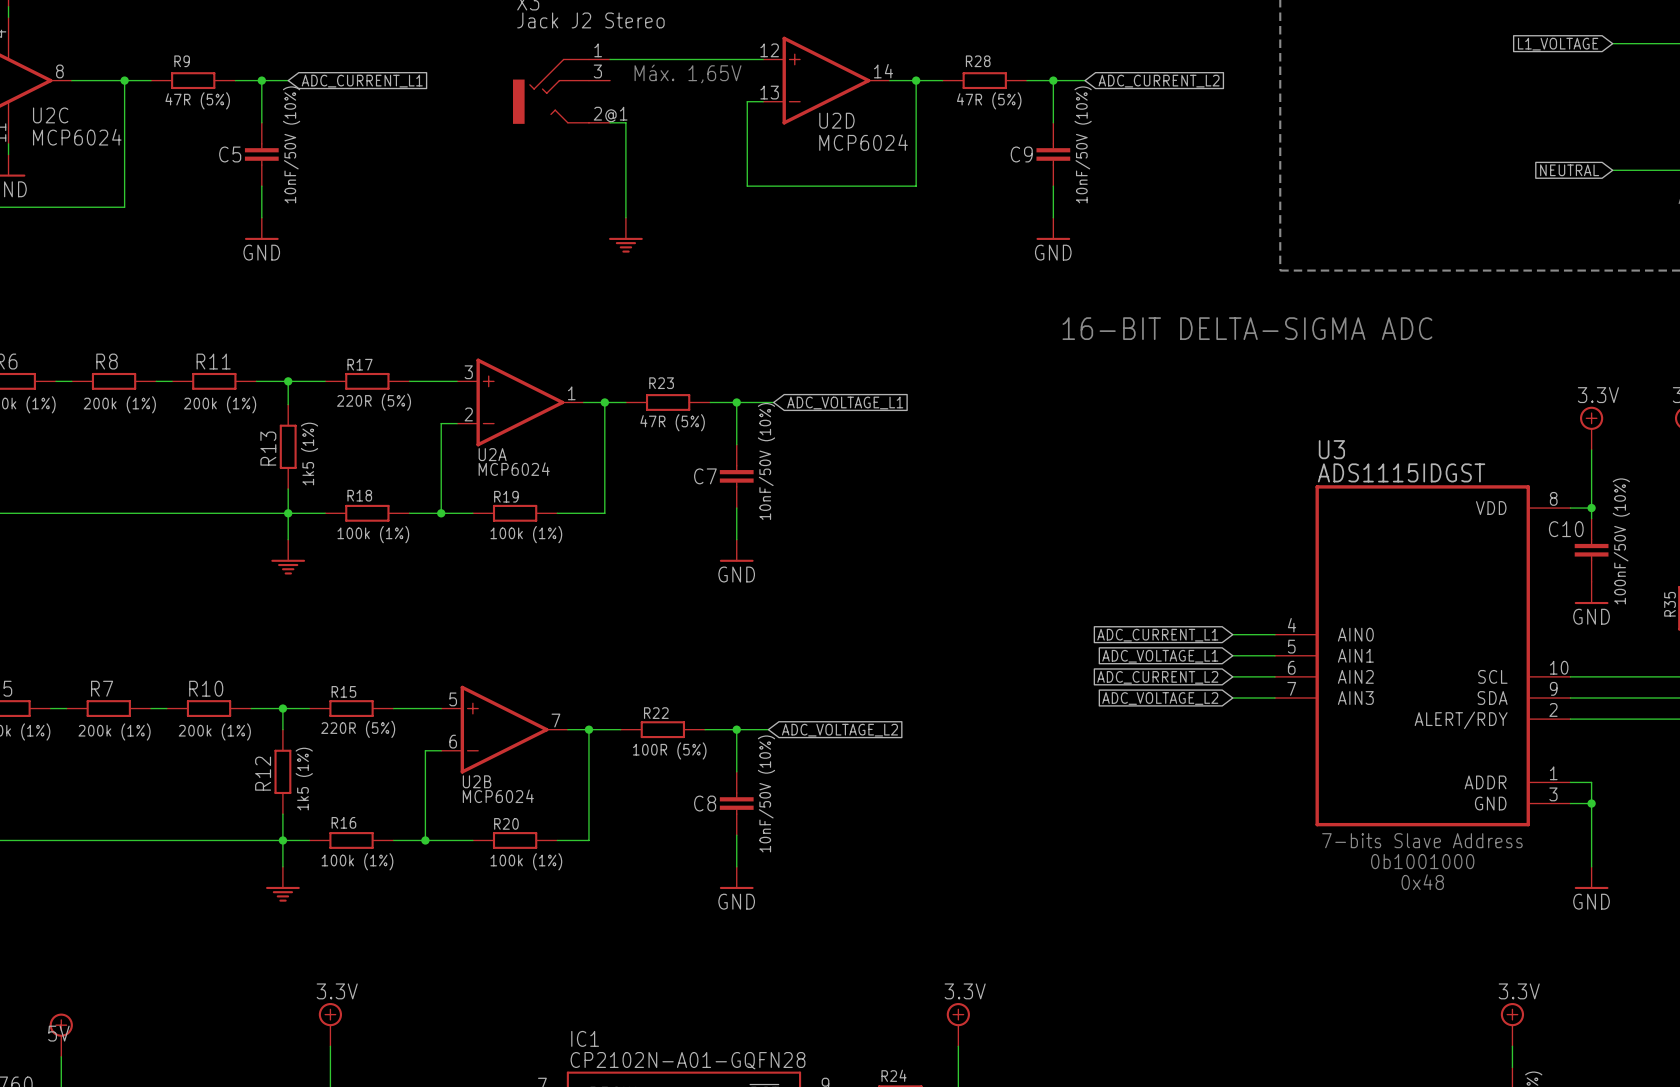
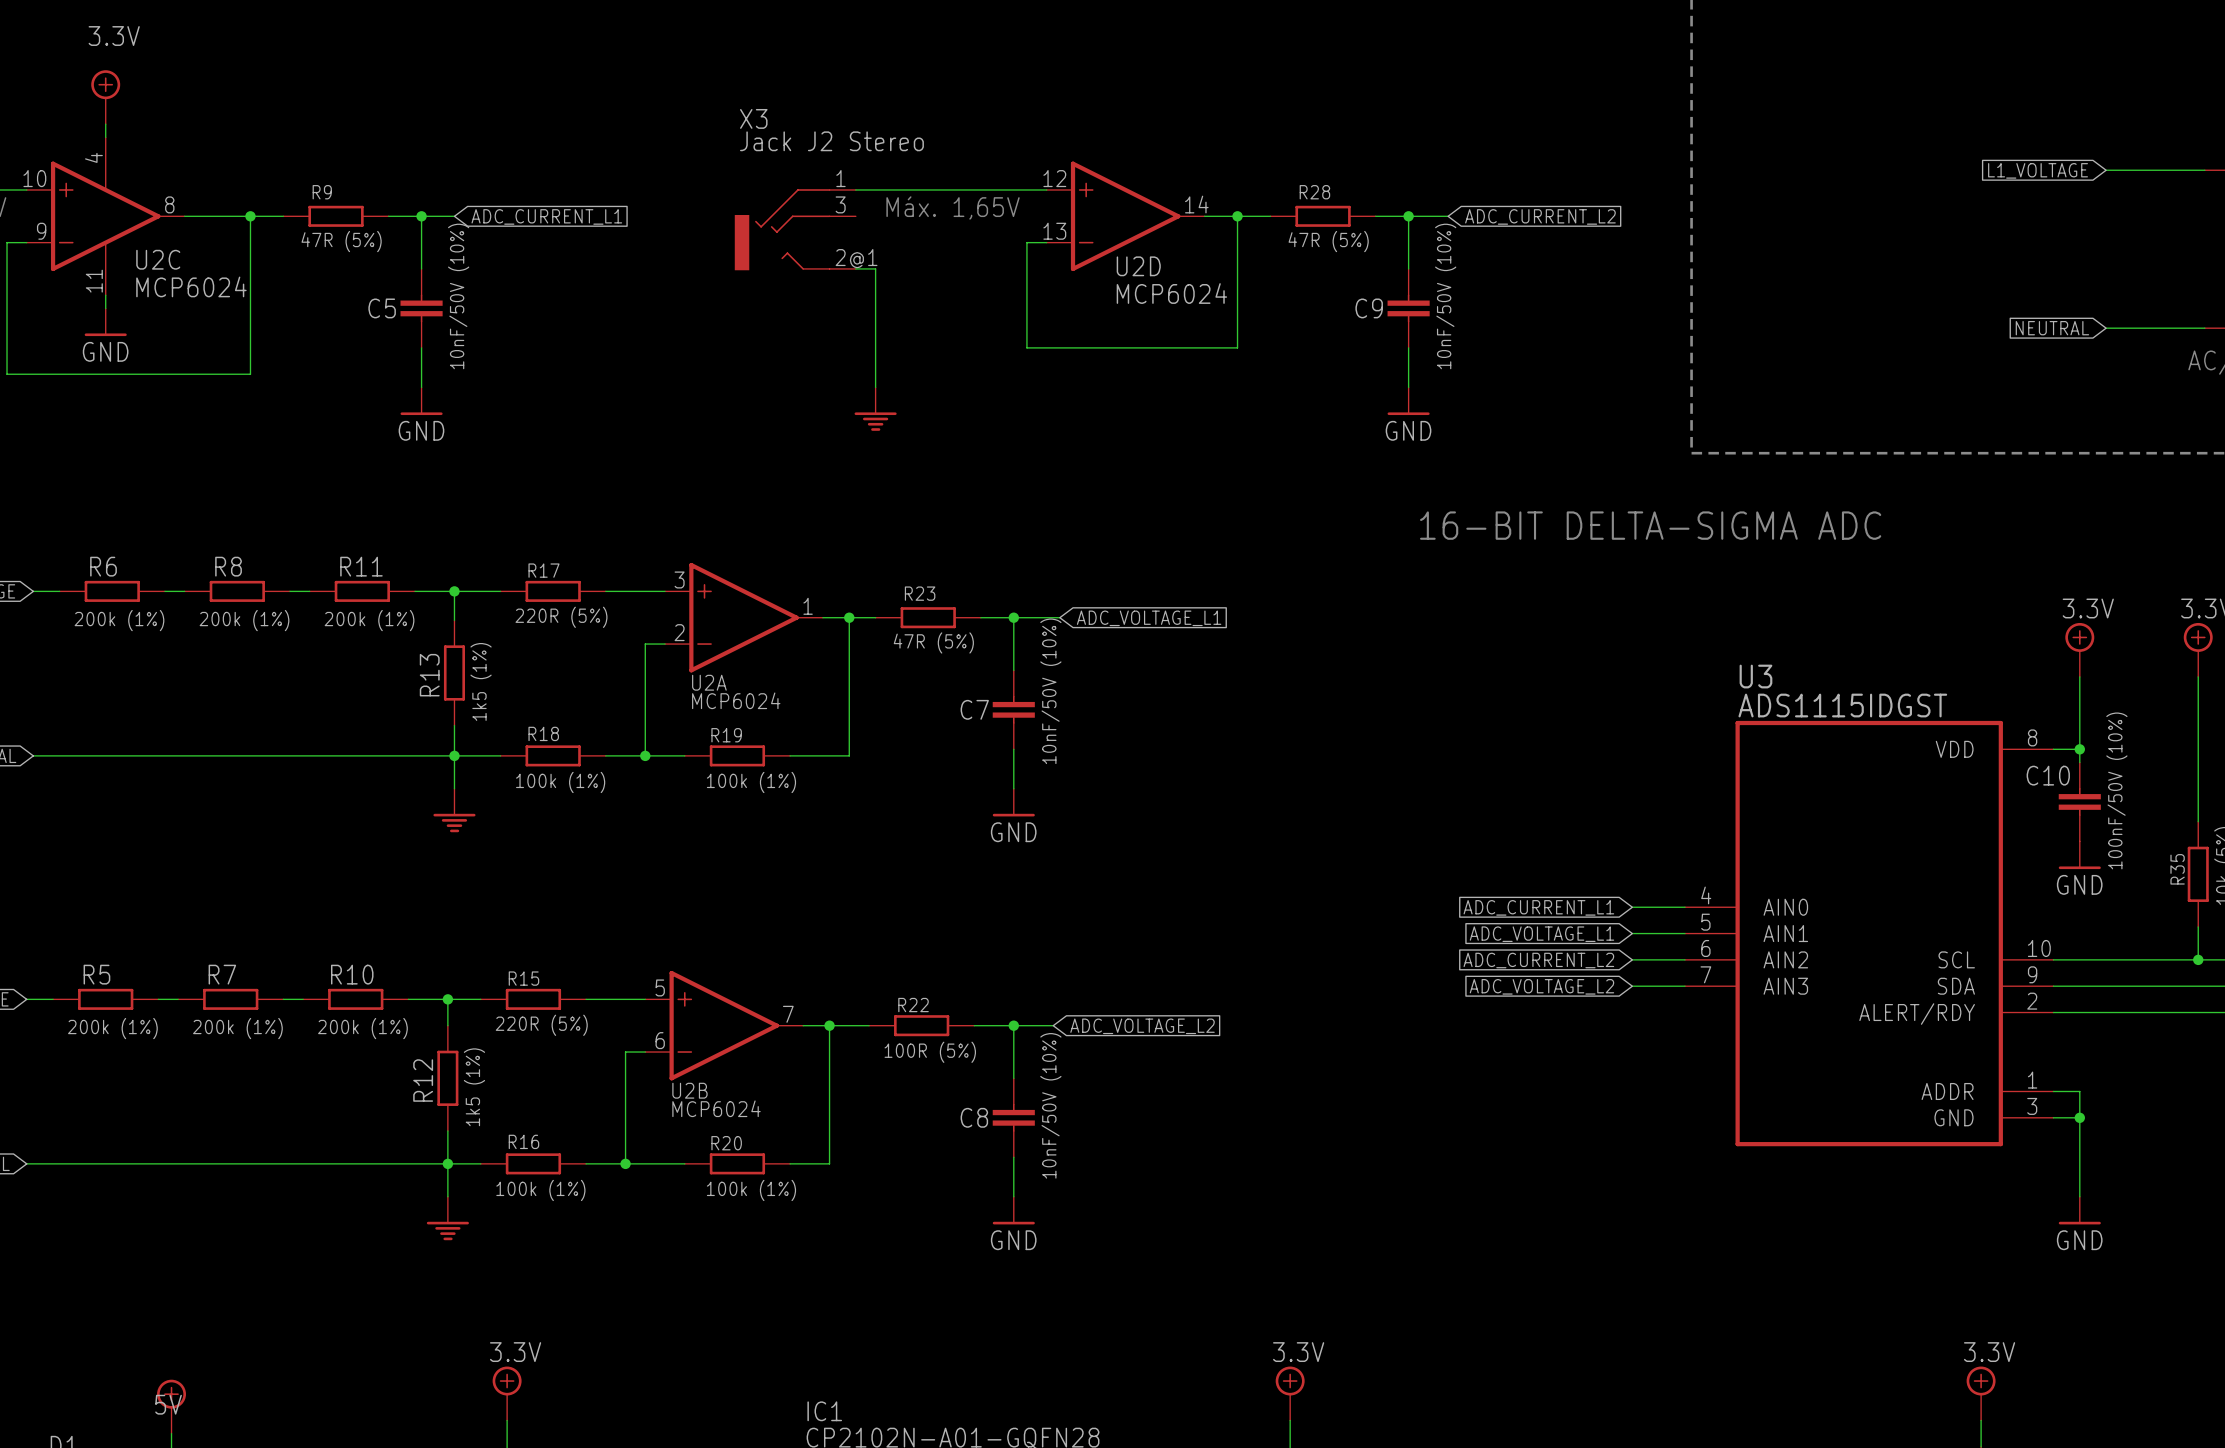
text: 7-bits Slave Address (1422, 840) -> none
text: 0b1001000 (1422, 861) -> none
text: 0x48 (1422, 882) -> none

